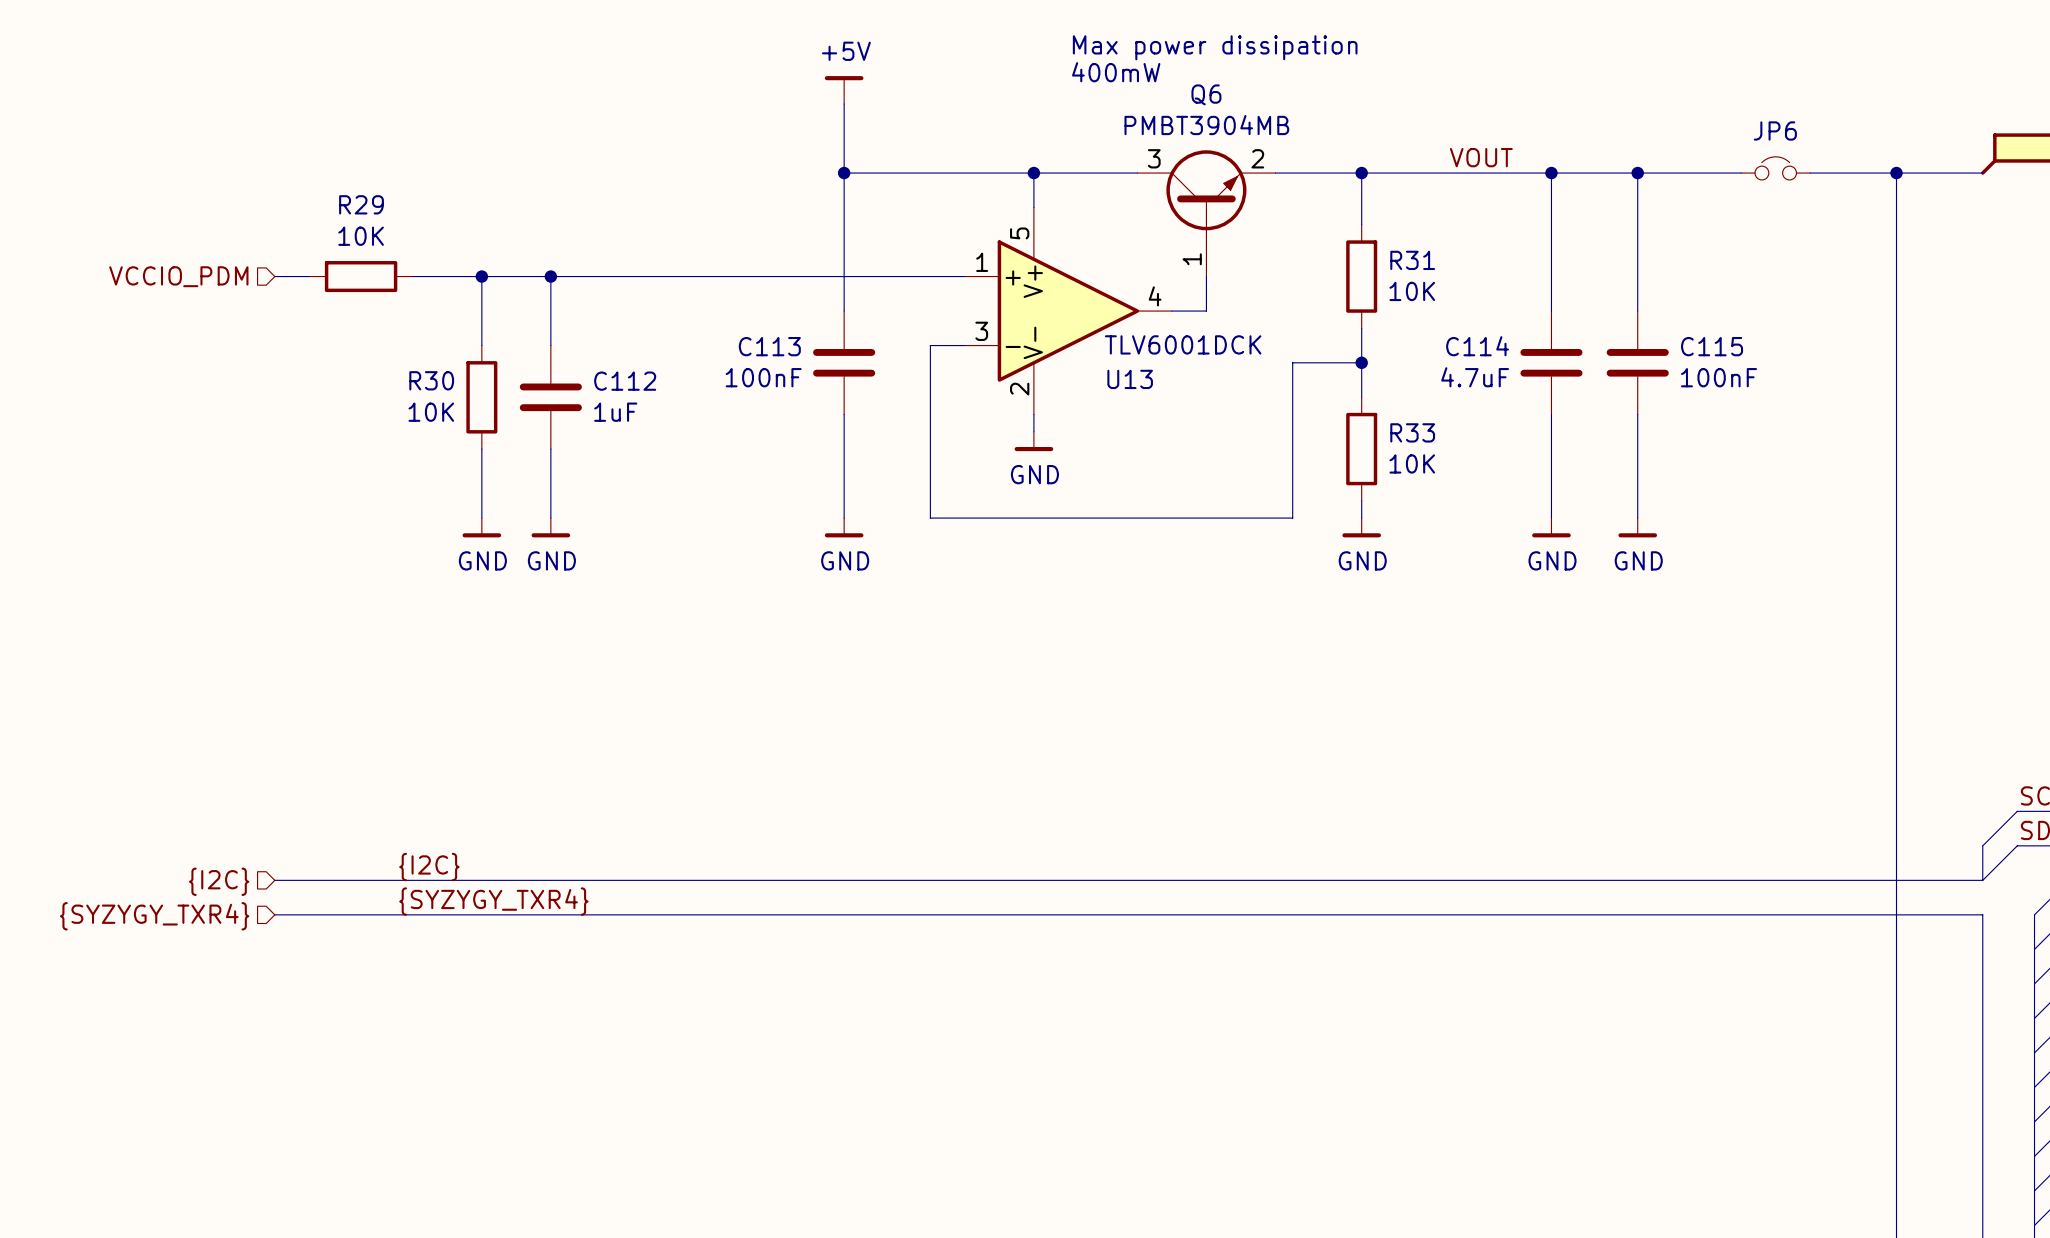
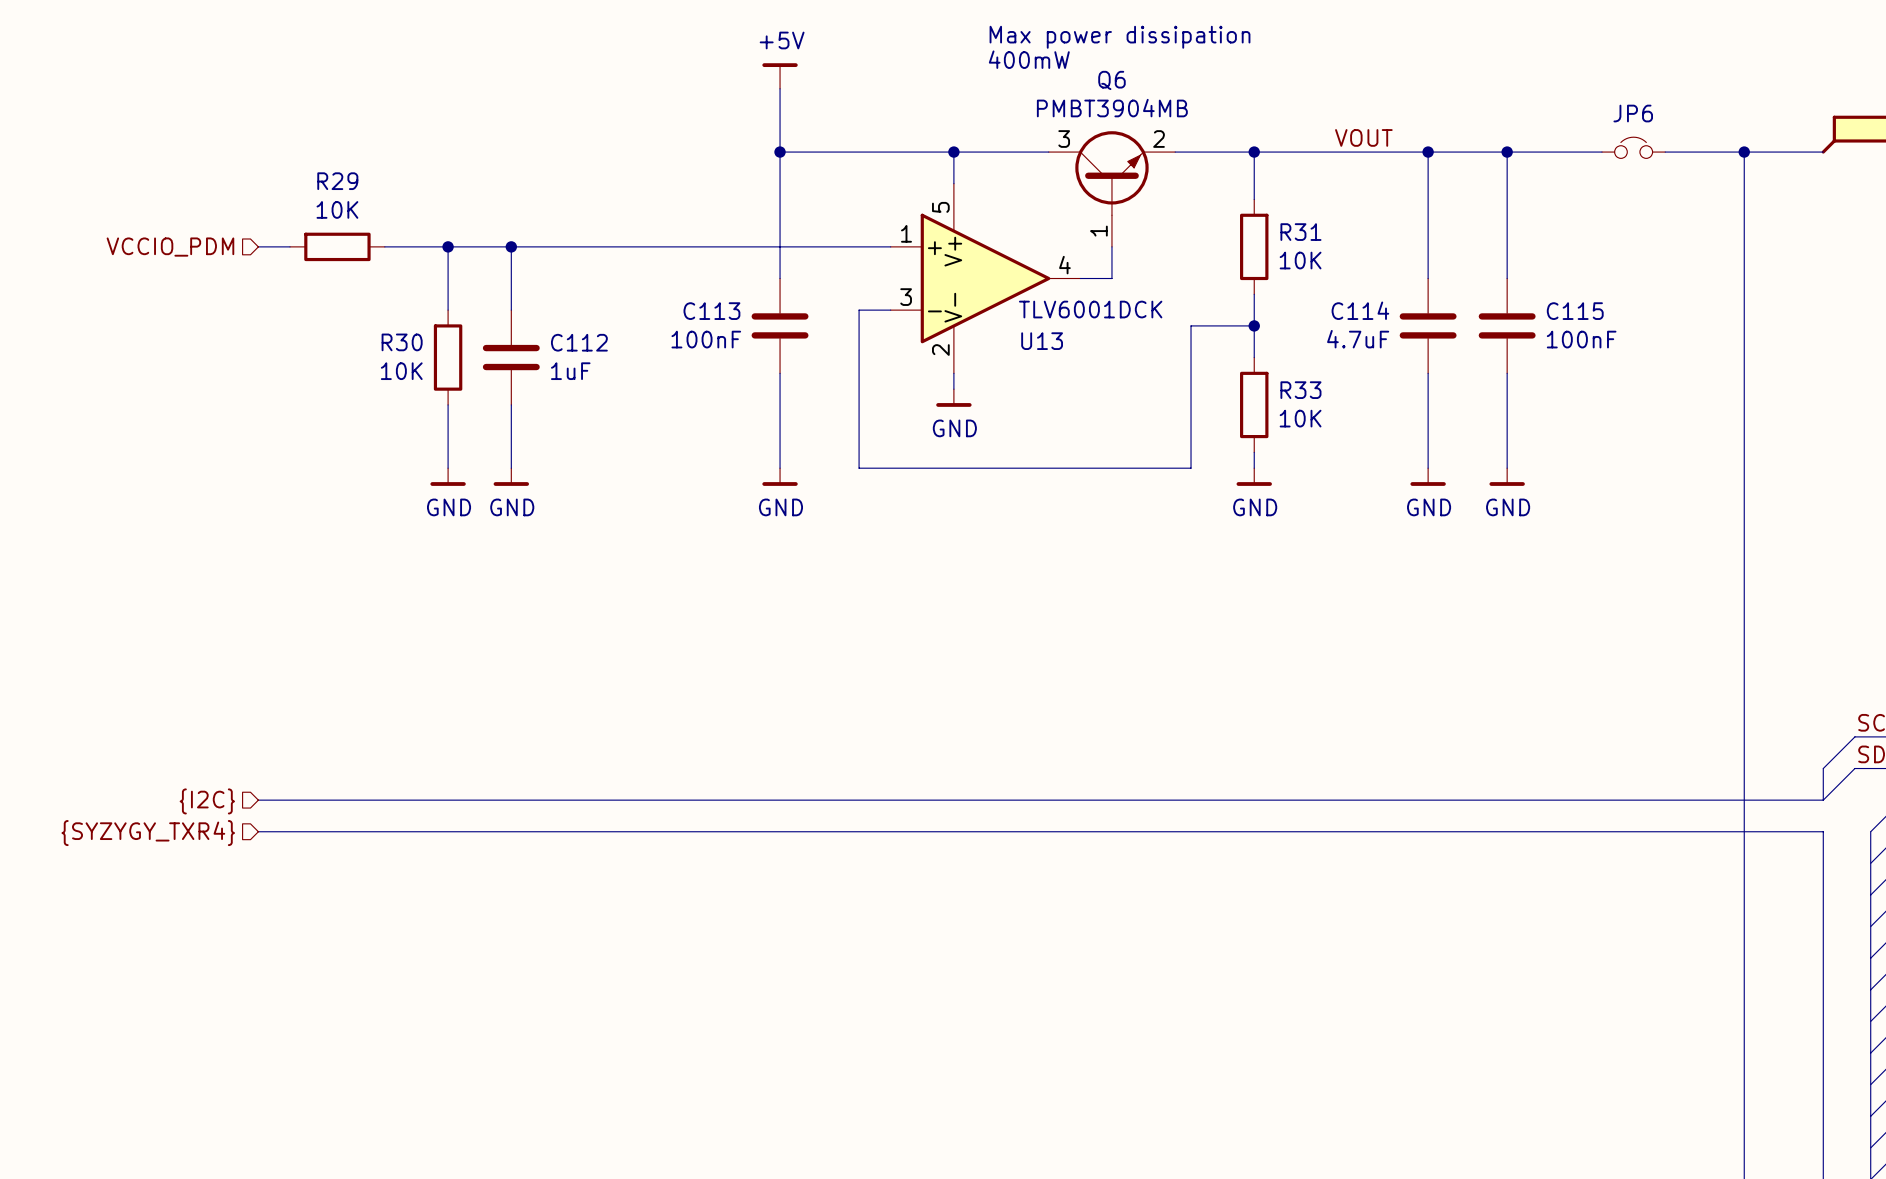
label: {I2C} (429, 867) -> none
label: {SYZYGY_TXR4} (493, 901) -> none

